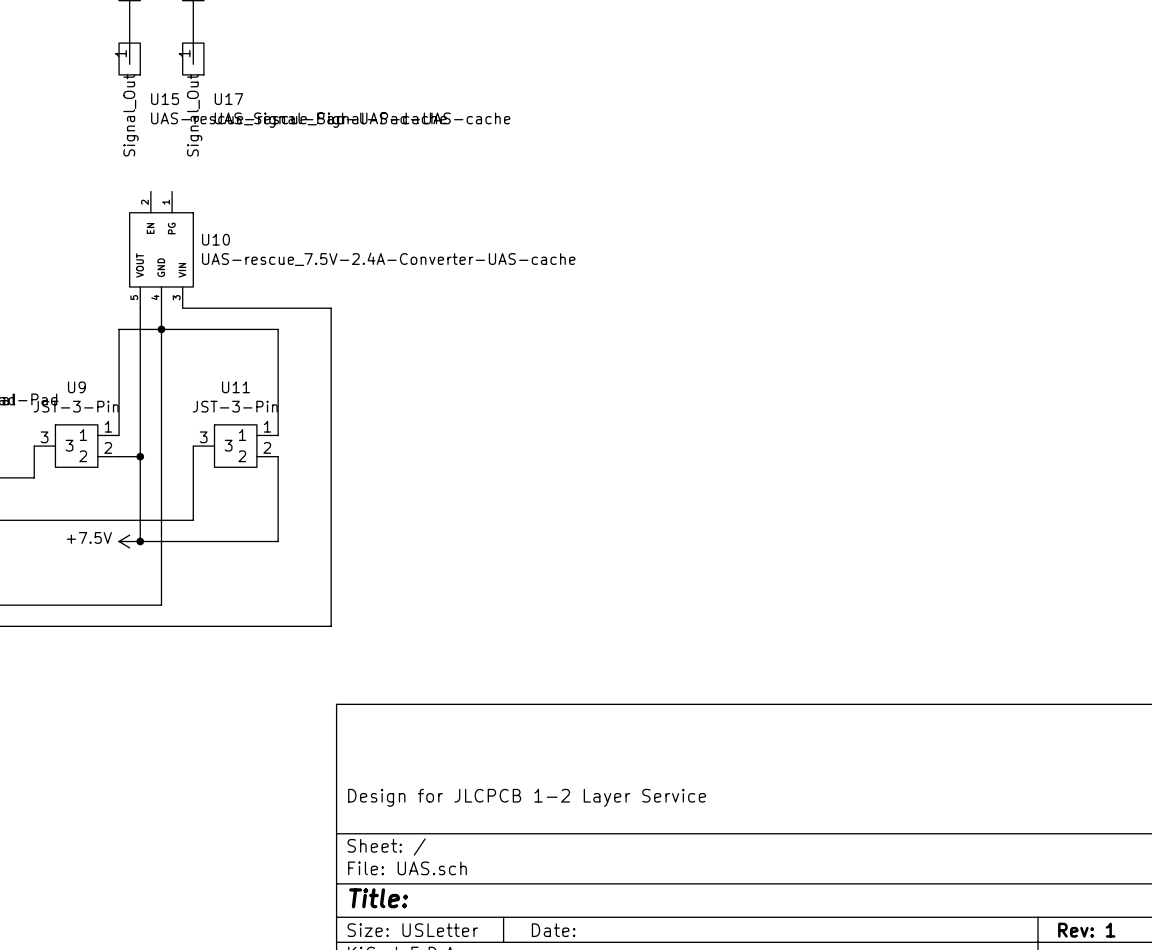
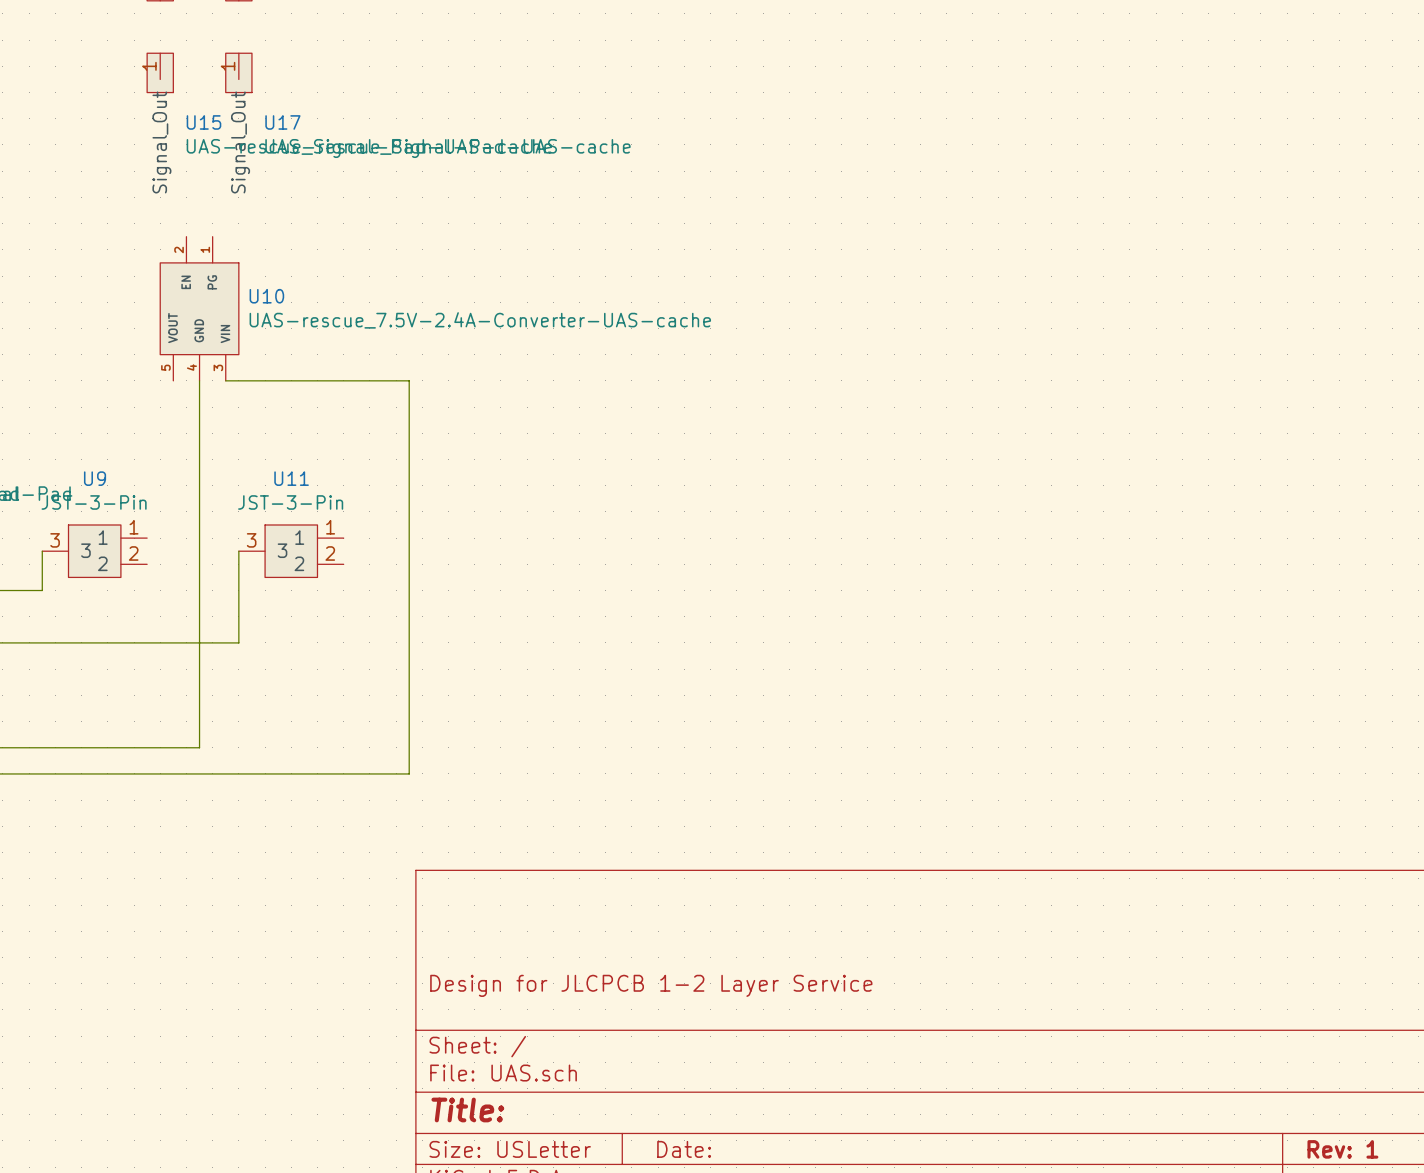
wire: (129, 0) (129, 43) -> none
wire: (193, 0) (193, 43) -> none
wire: (140, 308) (140, 541) (278, 541) (278, 456) -> none
junction: (161, 329) -> none
wire: (119, 435) (119, 329) (278, 329) (278, 435) -> none
wire: (119, 456) (140, 456) -> none
junction: (140, 456) -> none
power symbol: +7.5V (129, 541) -> none
junction: (140, 541) -> none

